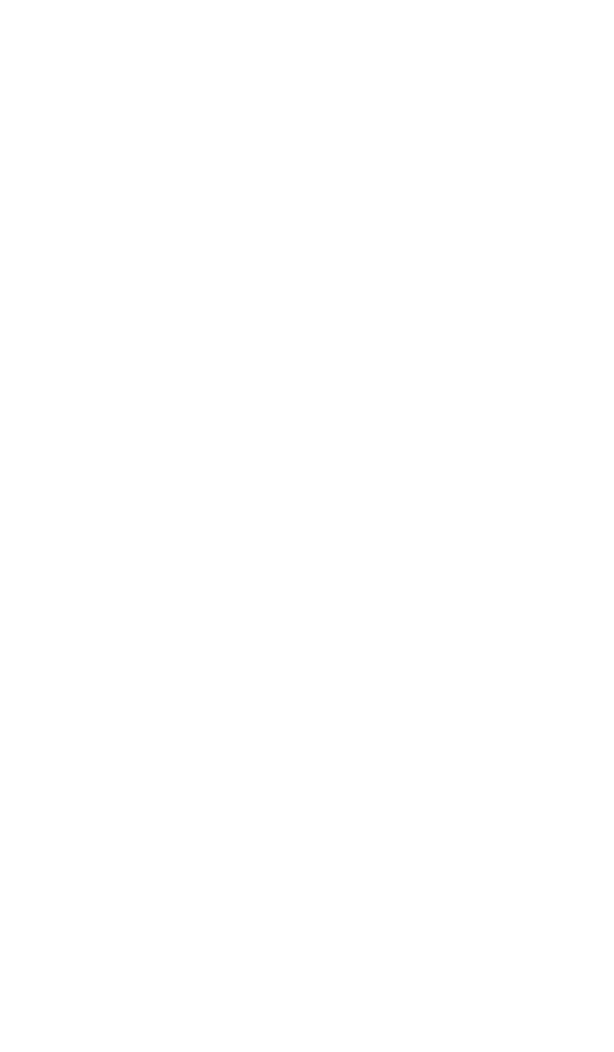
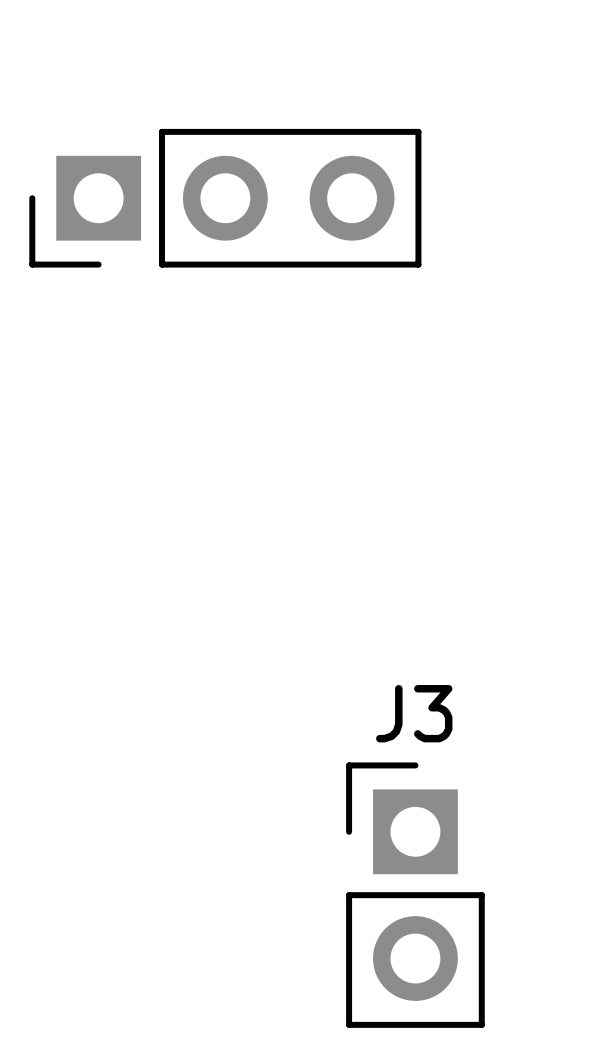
part: none -> (225, 198)
J3: none -> (415, 895)

